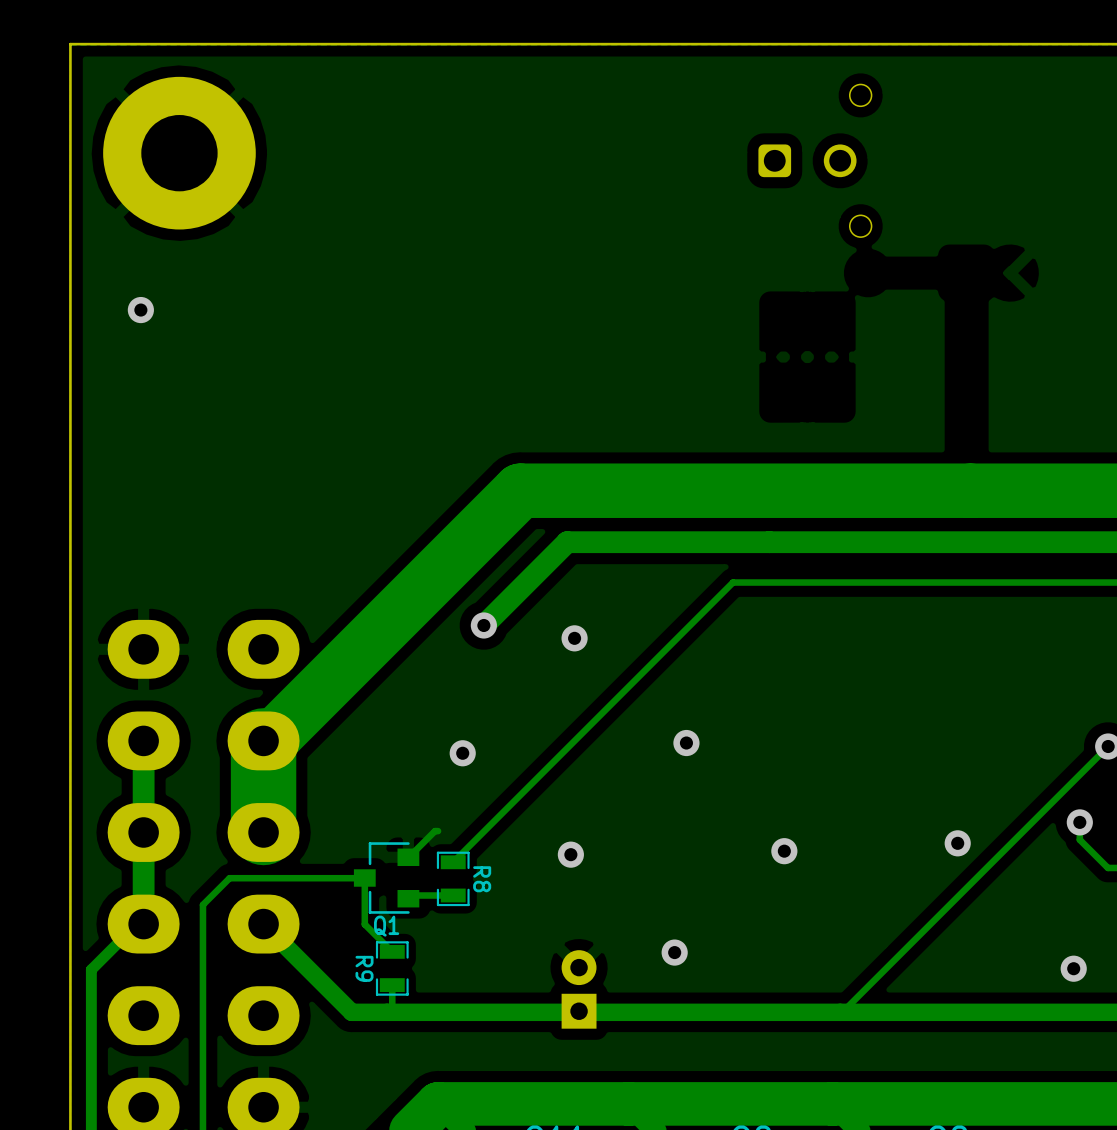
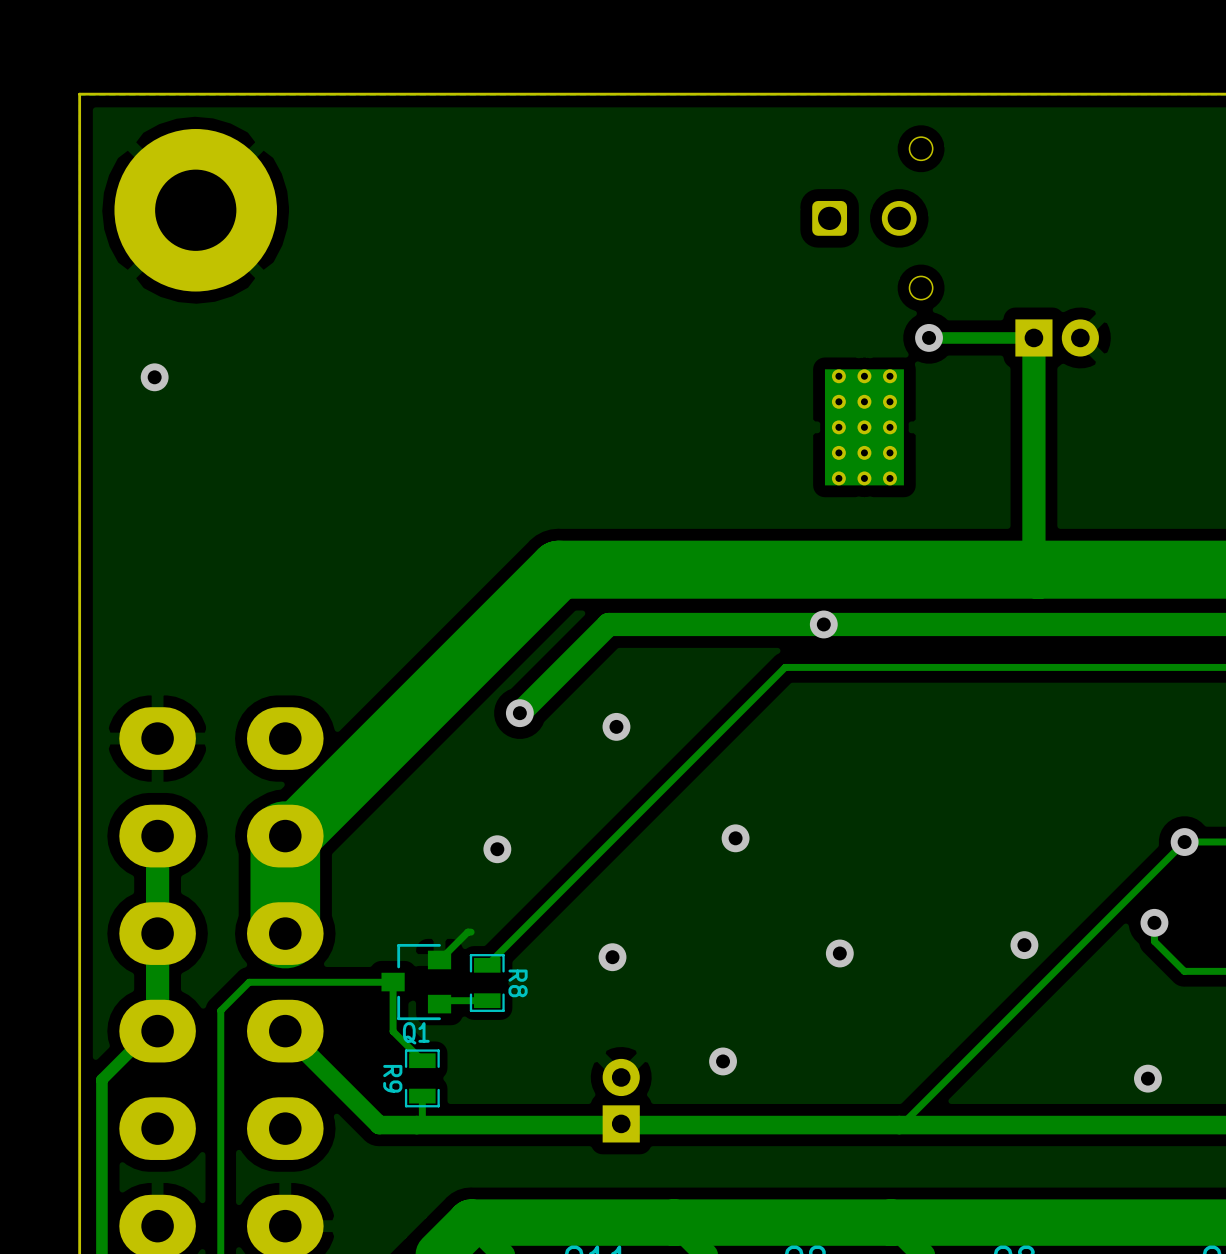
track: none -> (929, 337) (1033, 337) (1033, 565) (1038, 569)
via: none -> (929, 337)
part: none -> (1057, 337)
part: none -> (864, 427)
via: none -> (823, 624)

